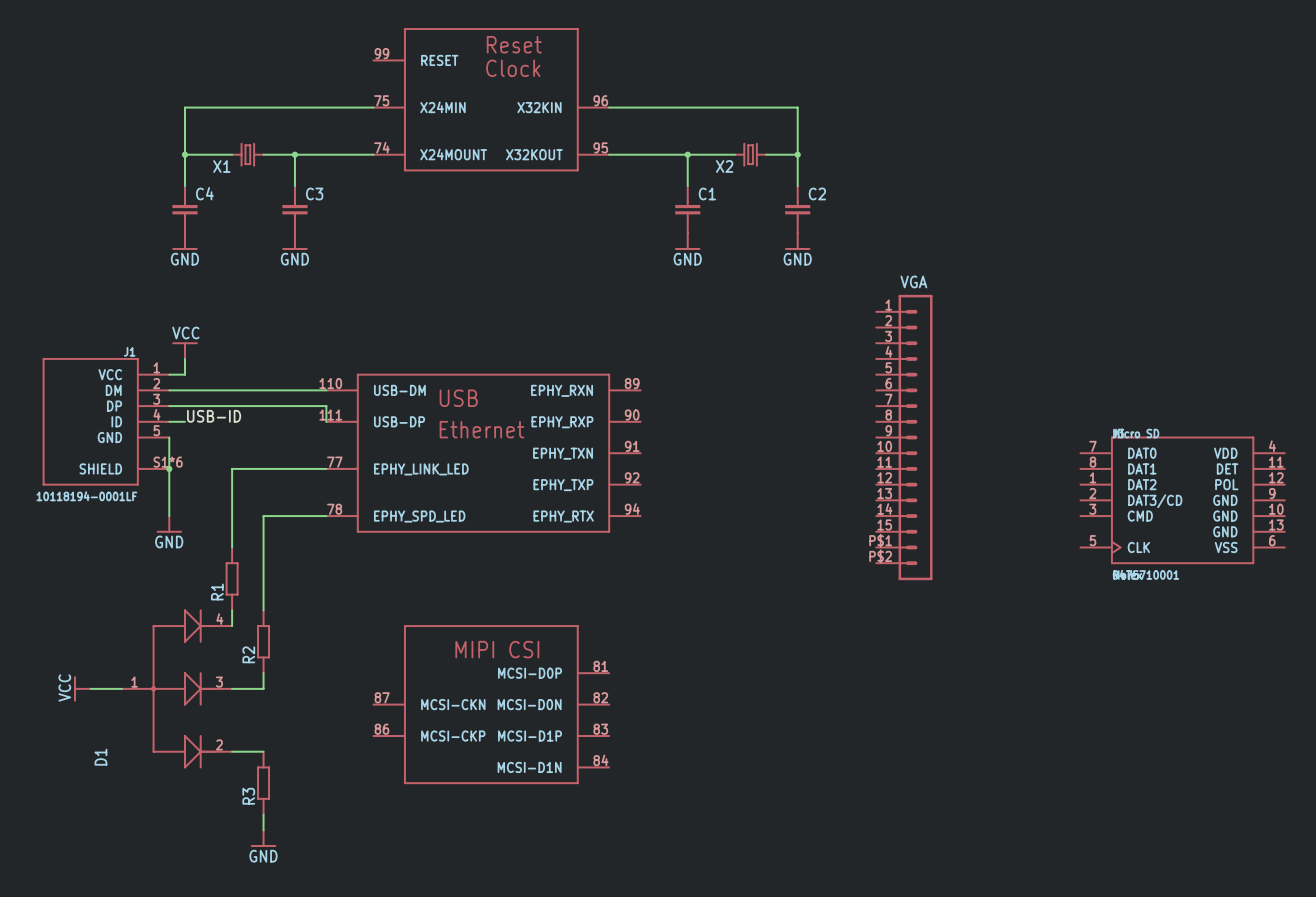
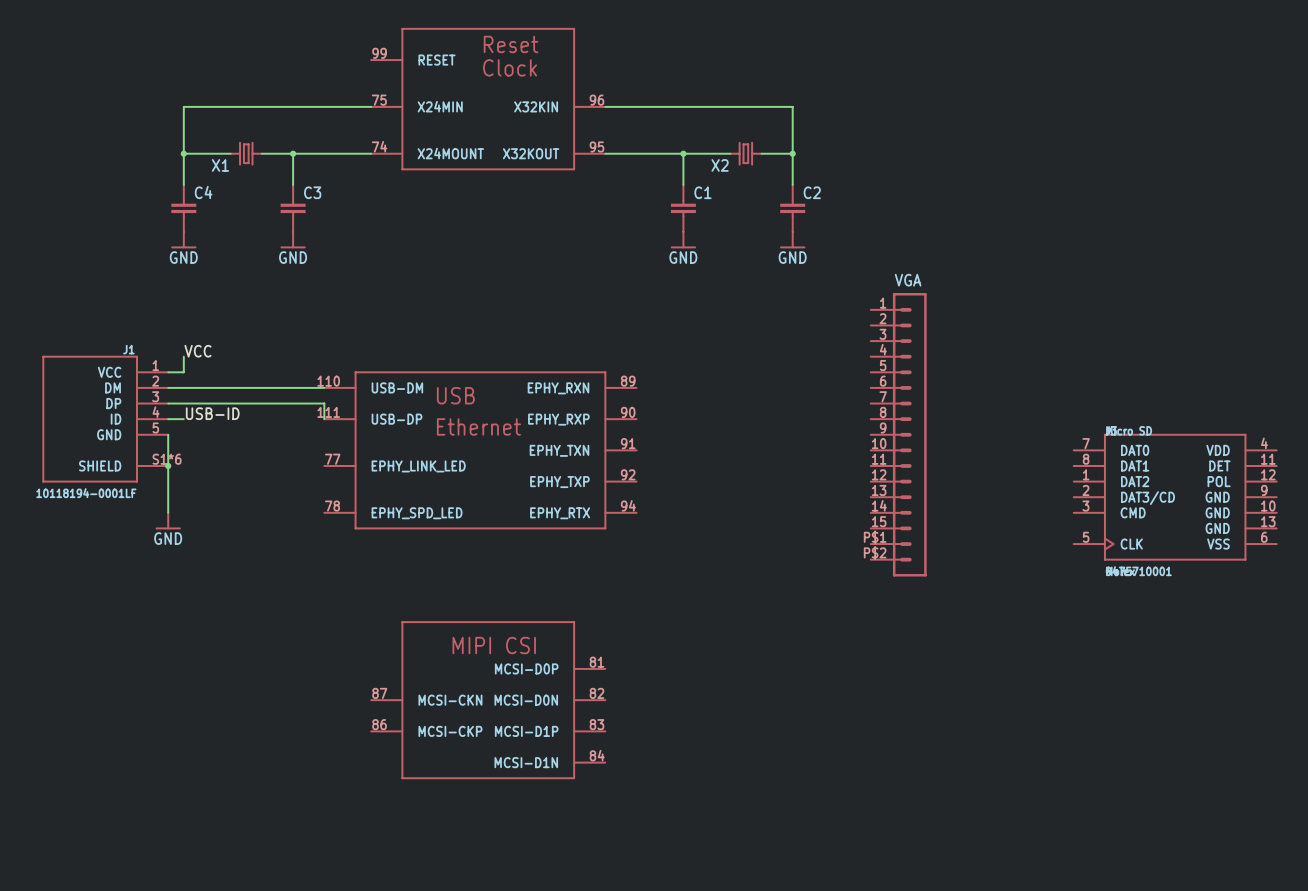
power symbol: VCC (184, 350) -> none
label: none -> VCC (197, 351)
wire: (326, 468) (232, 468) (232, 547) -> none
wire: (326, 516) (263, 516) (263, 610) -> none
R1: (232, 578) -> none
wire: (232, 610) (232, 626) -> none
R2: (263, 641) -> none
wire: (263, 673) (263, 688) (232, 688) -> none
power symbol: VCC (82, 688) -> none
wire: (90, 688) (122, 688) -> none
D1: (177, 688) -> none
wire: (232, 751) (263, 751) -> none
R3: (263, 783) -> none
wire: (263, 814) (263, 830) -> none
power symbol: GND (263, 838) -> none

